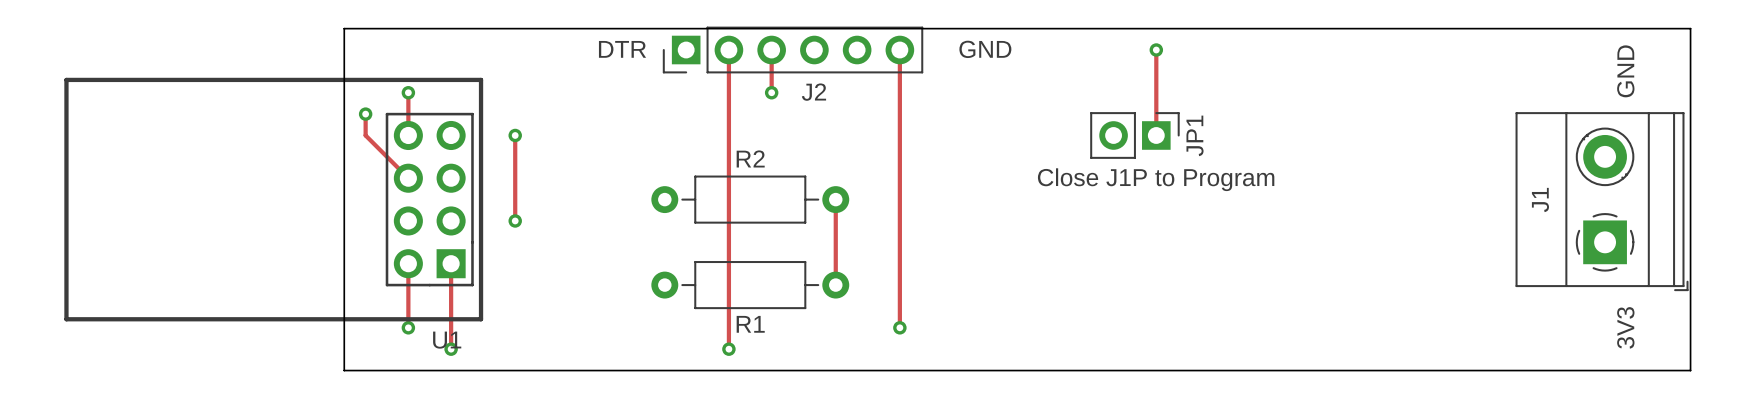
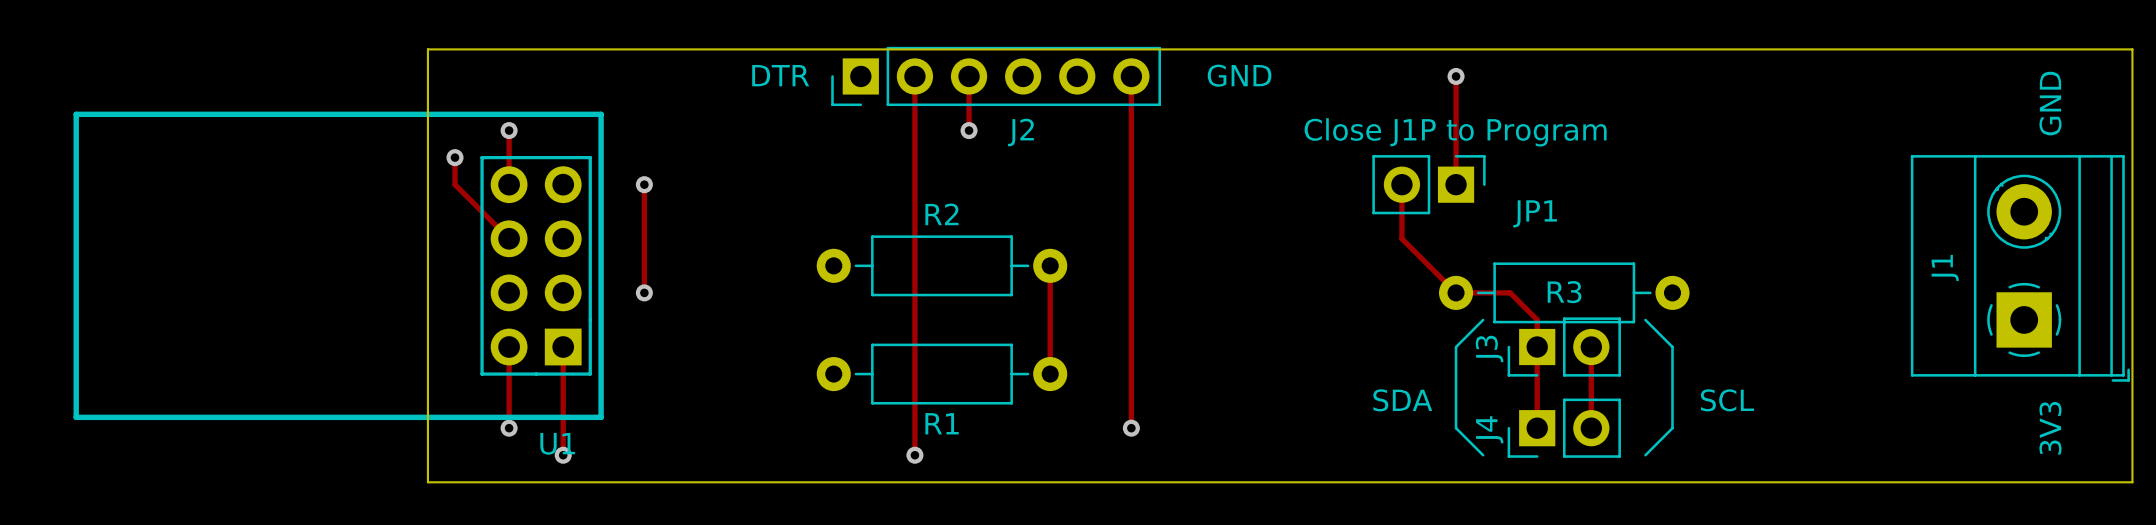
track: none -> (1401, 184) (1401, 238) (1456, 292) (1510, 292) (1537, 319) (1537, 428)
JP1 name rotation: 0° (1195, 135) -> 90° clockwise (1535, 213)
text position: Close J1P to Program (1156, 179) -> Close J1P to Program (1455, 132)
R3: none -> (1564, 292)
line: none -> (1483, 319) (1456, 347) (1456, 428) (1483, 455)
line: none -> (1645, 319) (1672, 347) (1672, 428) (1645, 455)
J3: none -> (1564, 347)
track: none -> (1591, 347) (1591, 428)
text: none -> SDA (1402, 400)
text: none -> SCL (1727, 400)
J4: none -> (1564, 428)

